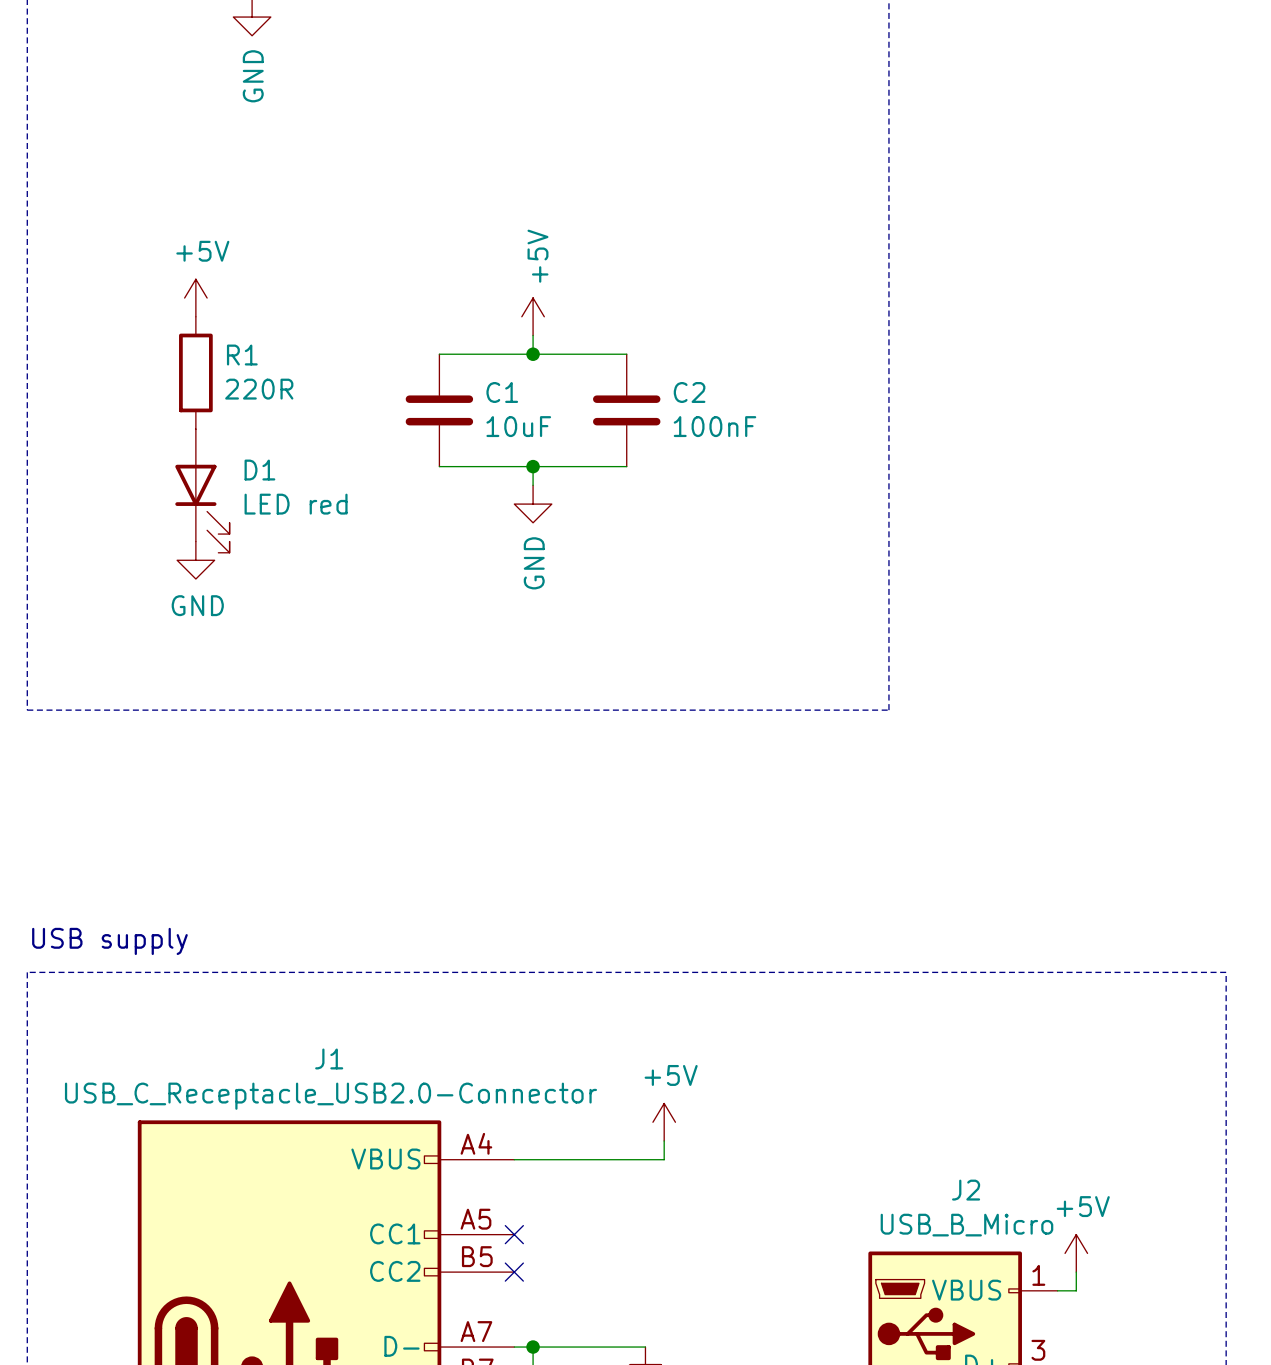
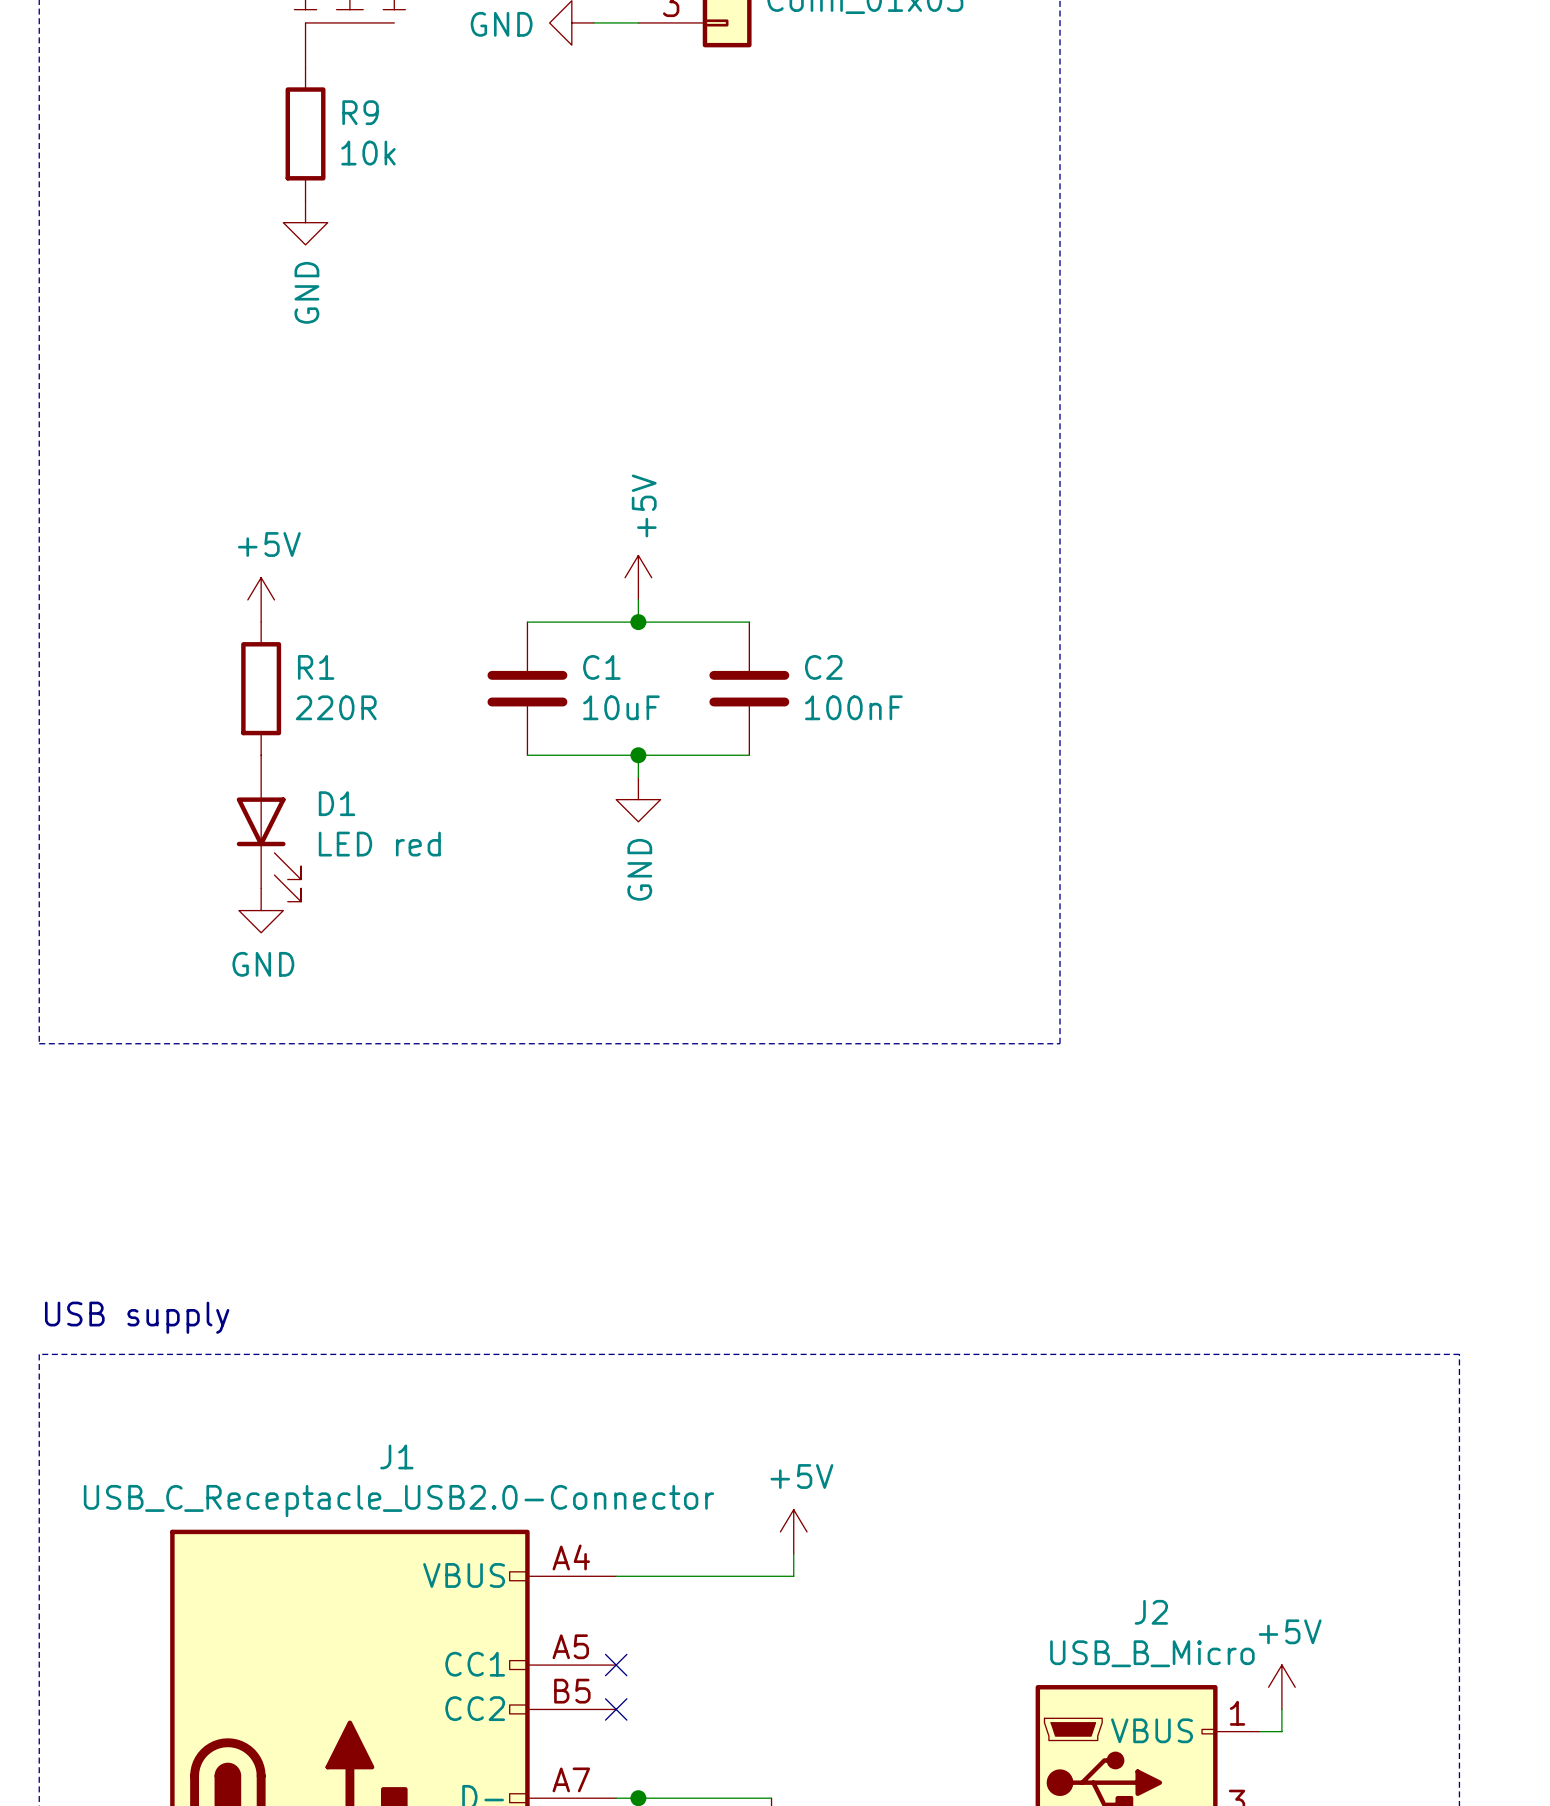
power symbol position: +5V (195, 298) -> +5V (261, 599)
R1 position: (195, 372) -> (261, 688)
D1 position: (202, 490) -> (268, 828)
power symbol position: GND (195, 560) -> GND (261, 910)

